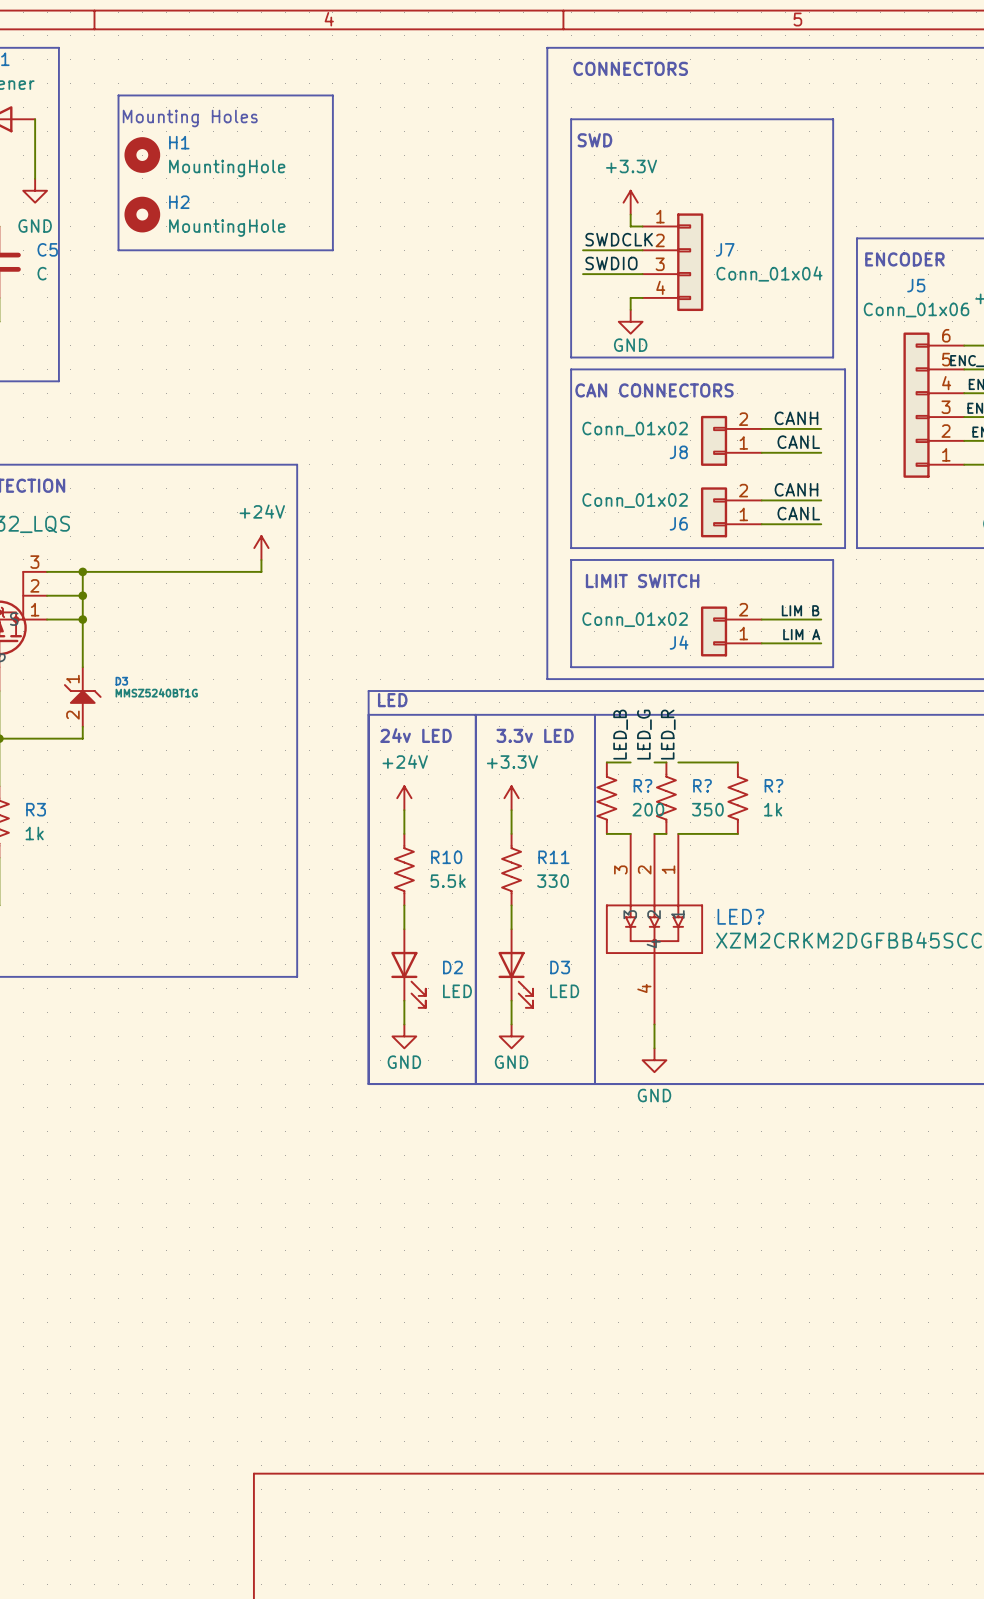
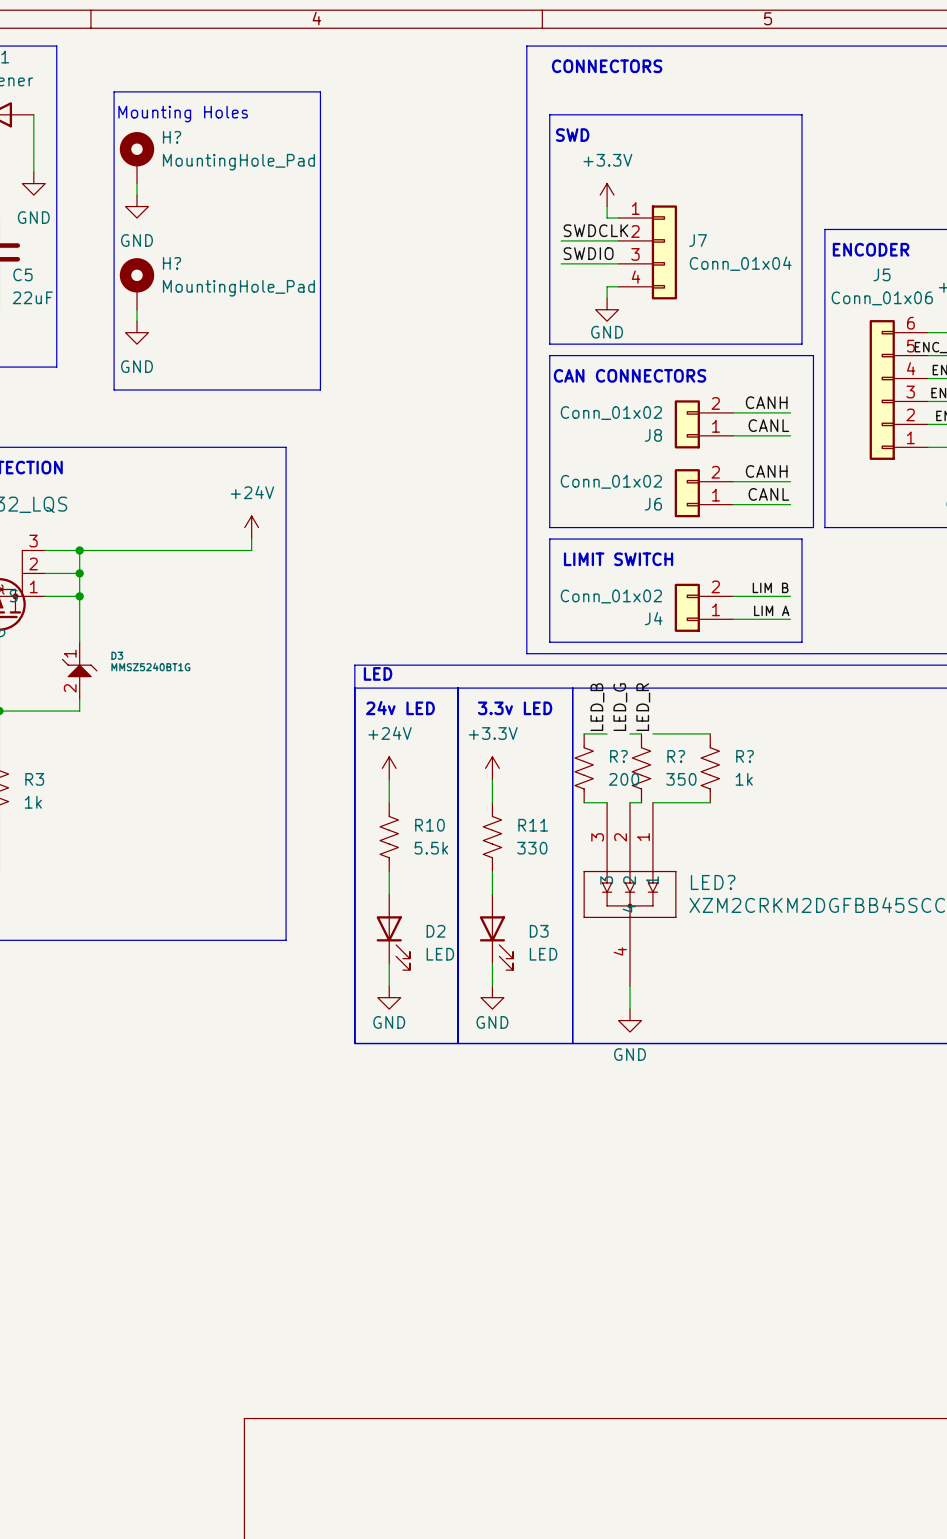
H1: MountingHole (142, 155) -> none
H?: none -> MountingHole_Pad (137, 157)
wire: none -> (137, 183) (137, 195)
H2: MountingHole (142, 214) -> none
power symbol: none -> GND (137, 206)
C5 name position: C5 (47, 249) -> C5 (22, 274)
line: (118, 250) (332, 250) -> (114, 240) (114, 389) (320, 389) (320, 240)
C5 value: C (42, 273) -> 22uF (32, 297)
H?: none -> MountingHole_Pad (137, 283)
wire: none -> (137, 309) (137, 321)
power symbol: none -> GND (137, 332)

